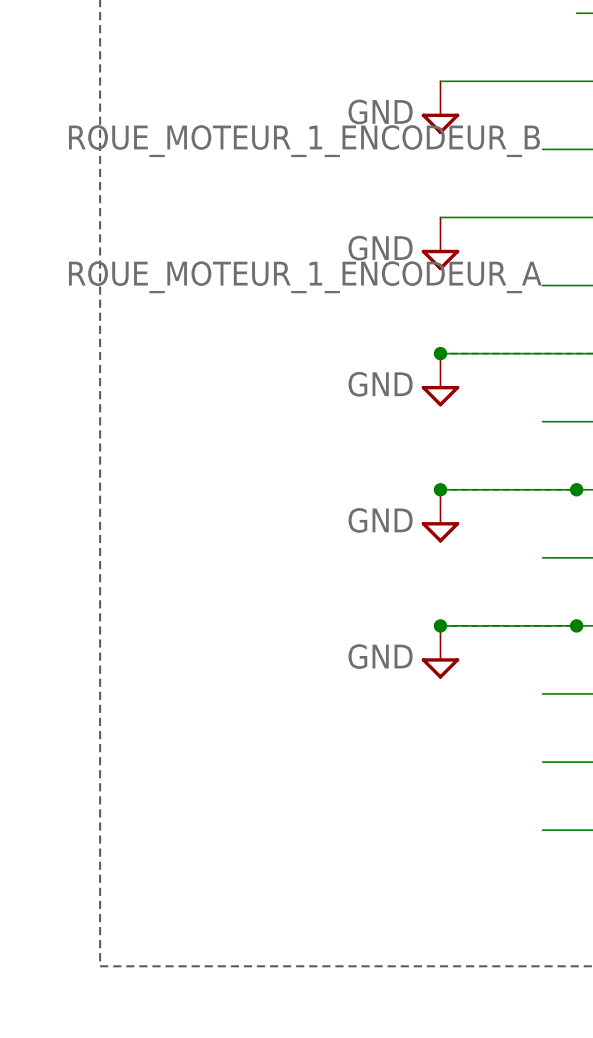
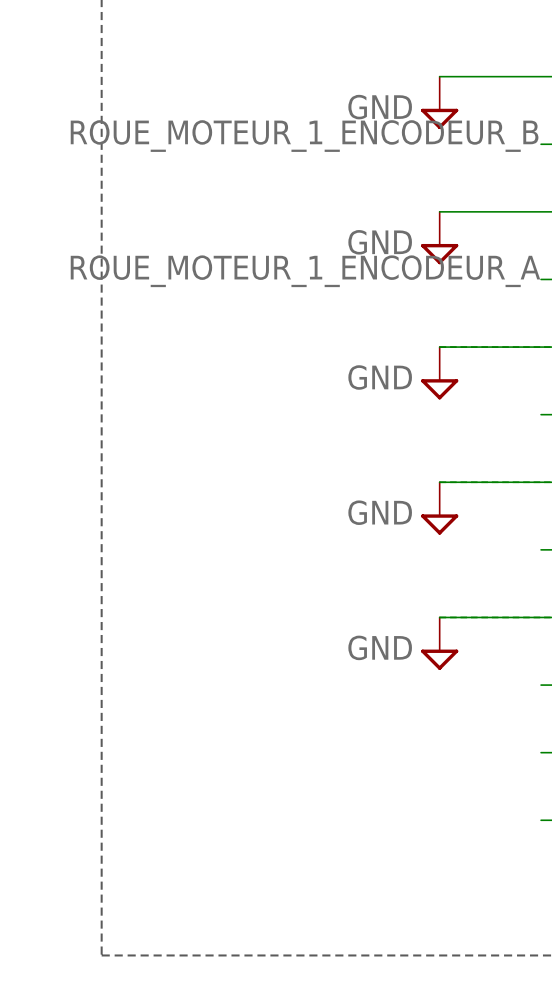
junction: (440, 353) -> none
junction: (440, 489) -> none
junction: (440, 625) -> none

